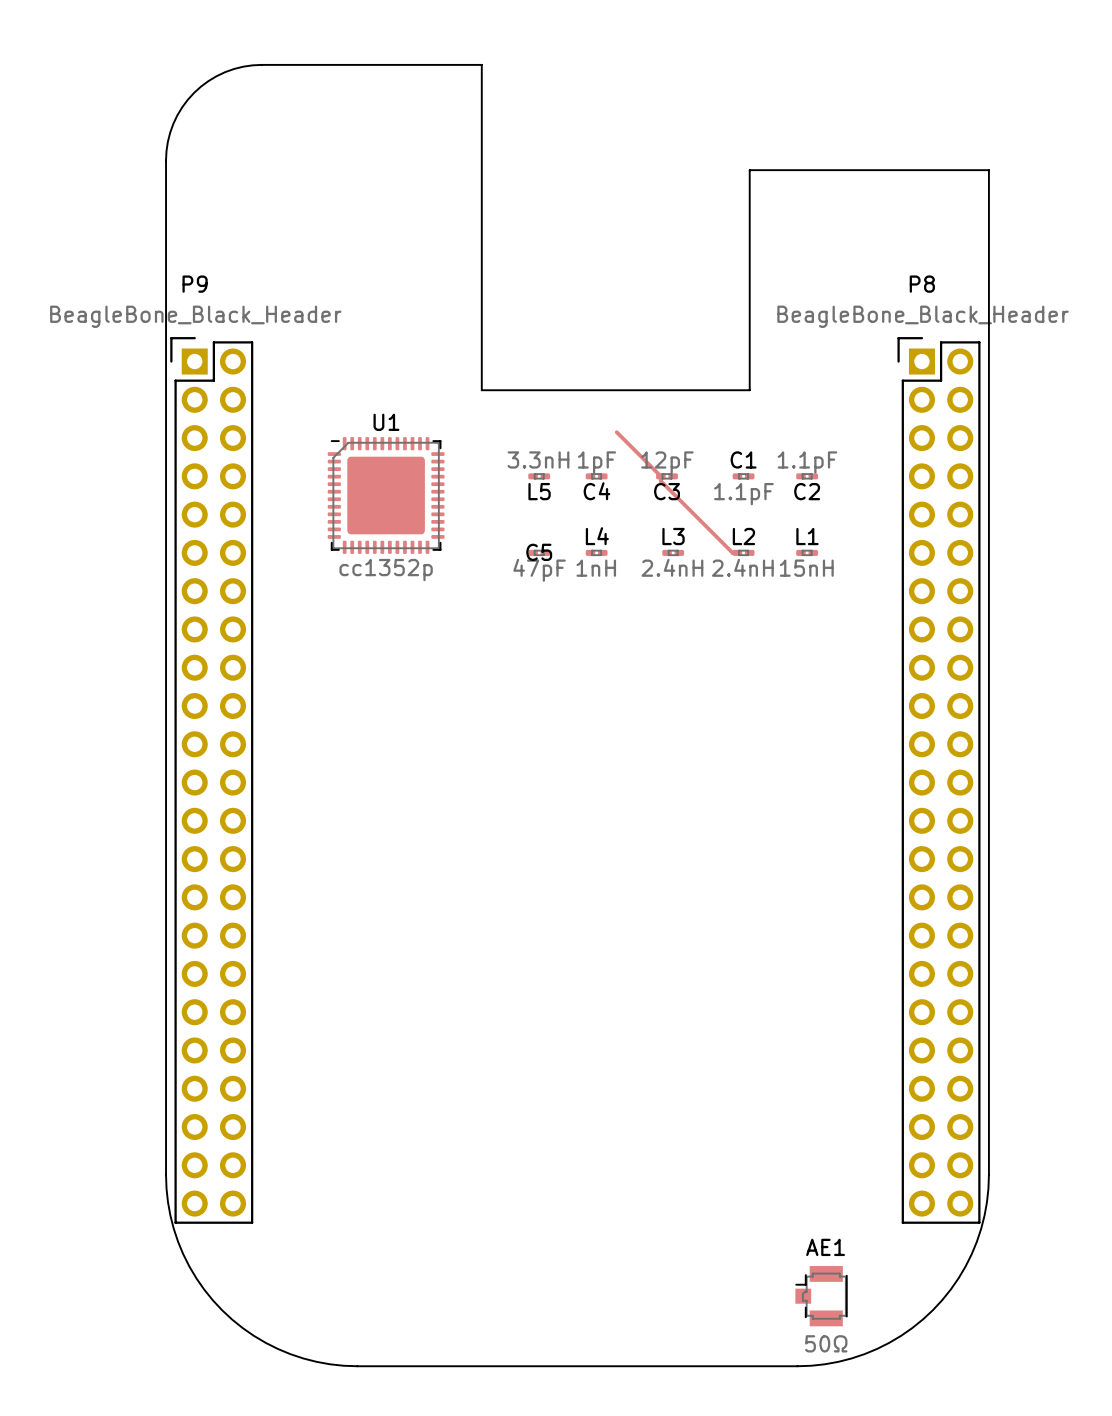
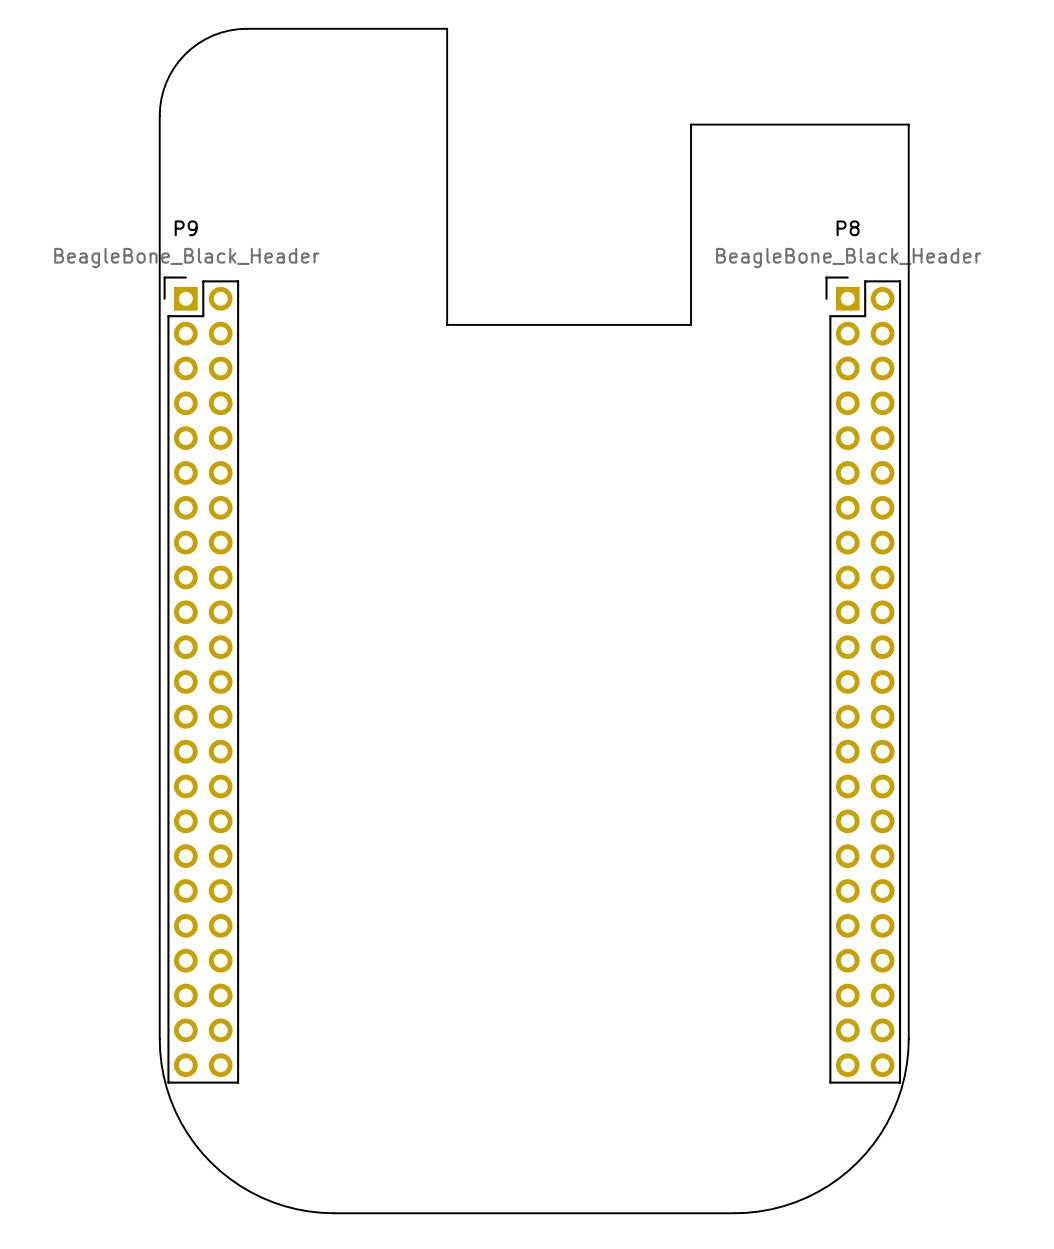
top track: (616, 432) (660, 476) (660, 481) (732, 552) (737, 552) -> none
L5: 3.3nH (539, 476) -> none
C4: 1pF (596, 476) -> none
C3: 12pF (667, 476) -> none
C1: 1.1pF (743, 476) -> none
C2: 1.1pF (807, 476) -> none
U1: cc1352p (386, 495) -> none
C5: 47pF (539, 552) -> none
L4: 1nH (596, 552) -> none
L3: 2.4nH (673, 552) -> none
L2: 2.4nH (743, 552) -> none
L1: 15nH (807, 552) -> none
AE1: 50Ω (821, 1296) -> none

